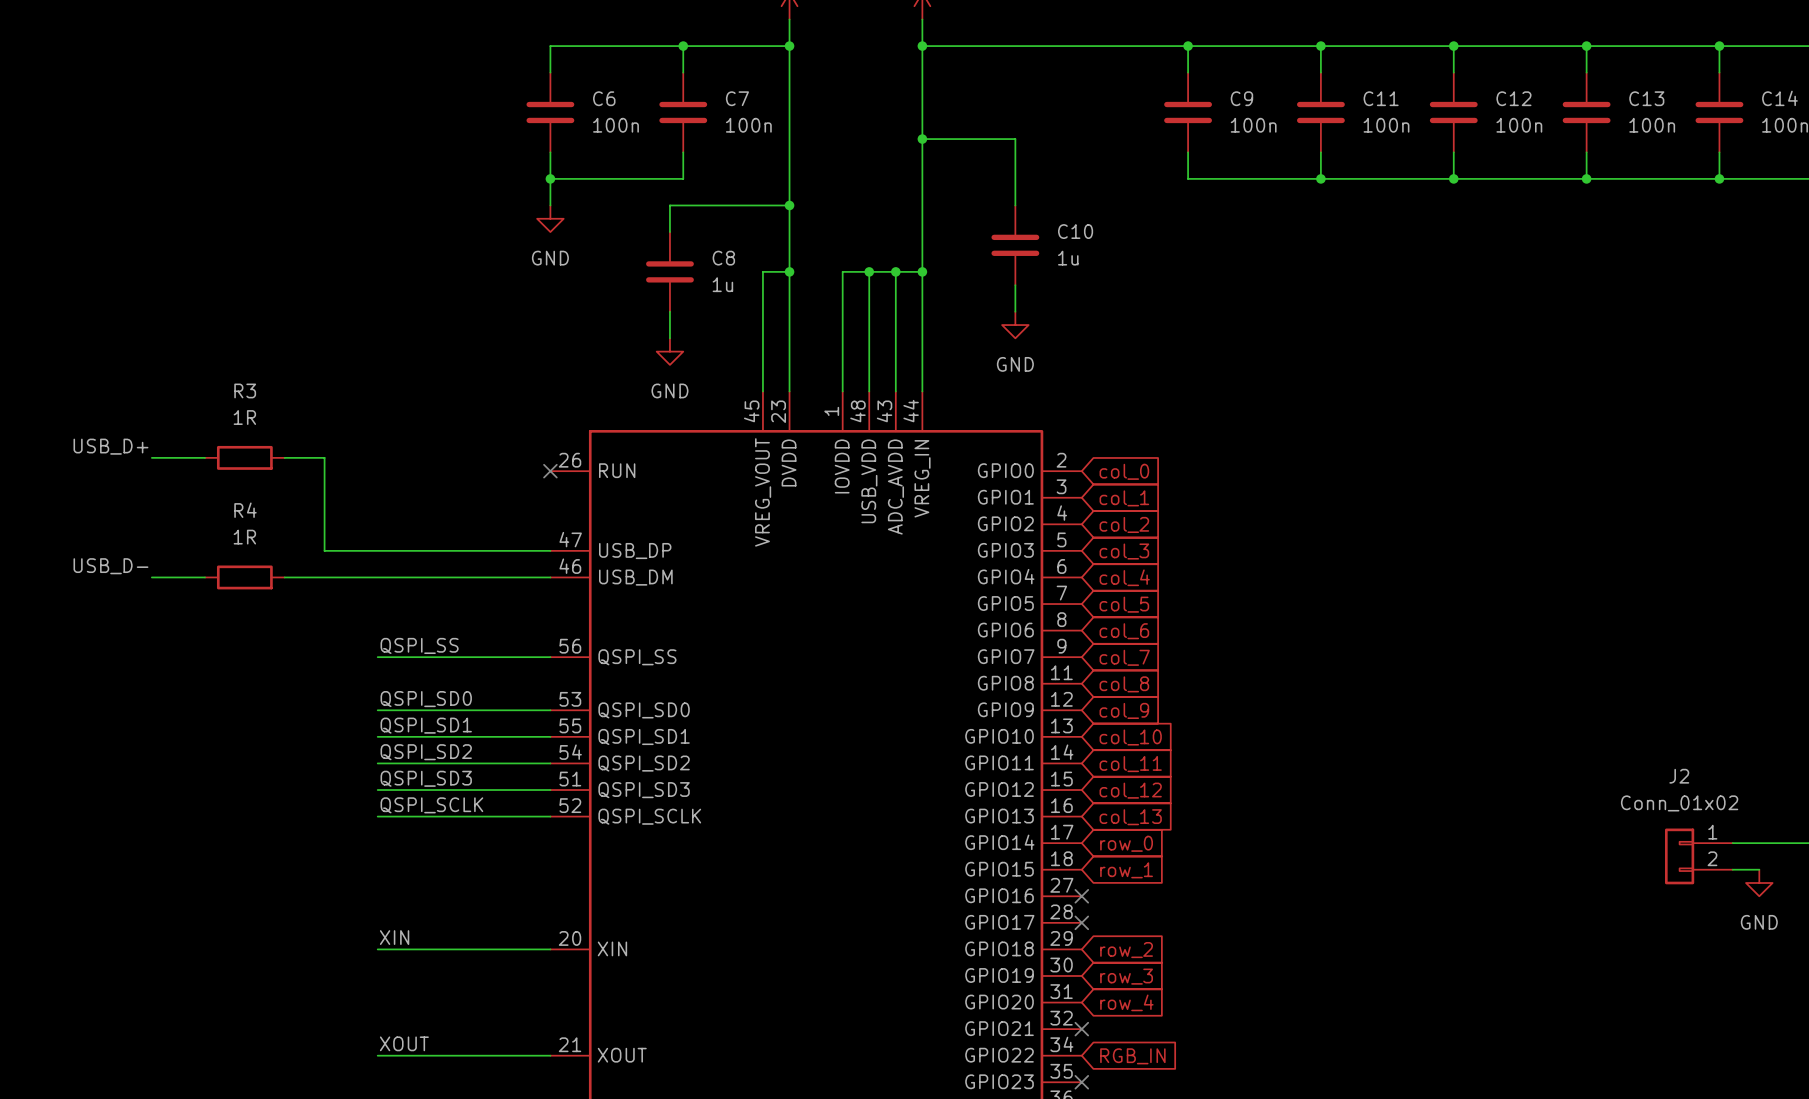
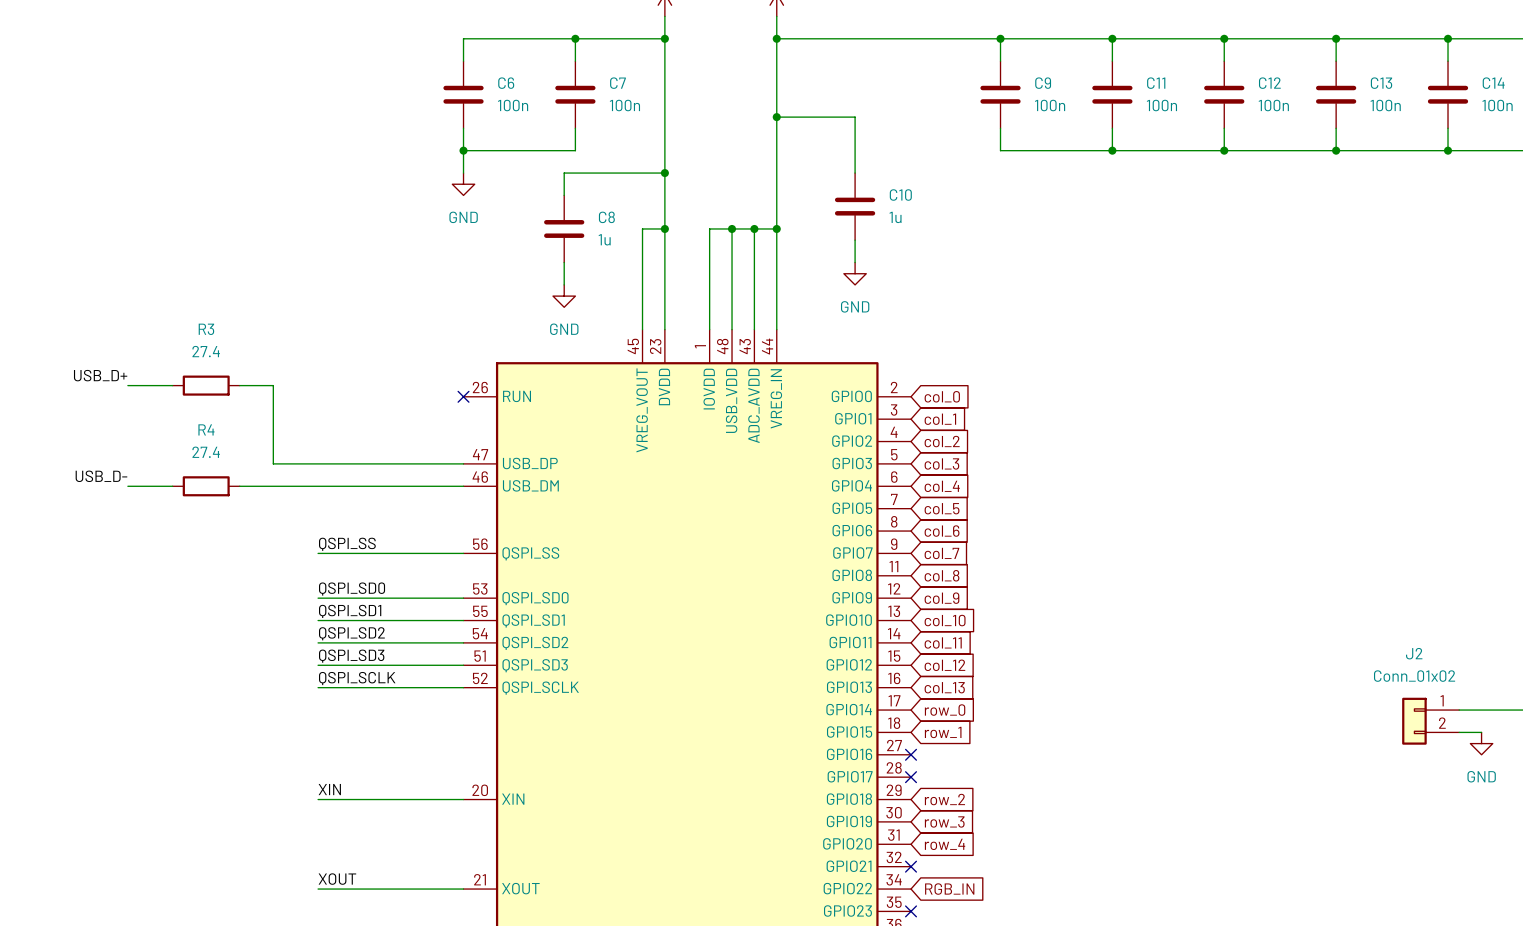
R3 value: 1R (244, 417) -> 27.4 (206, 351)
R4 value: 1R (244, 537) -> 27.4 (206, 452)

